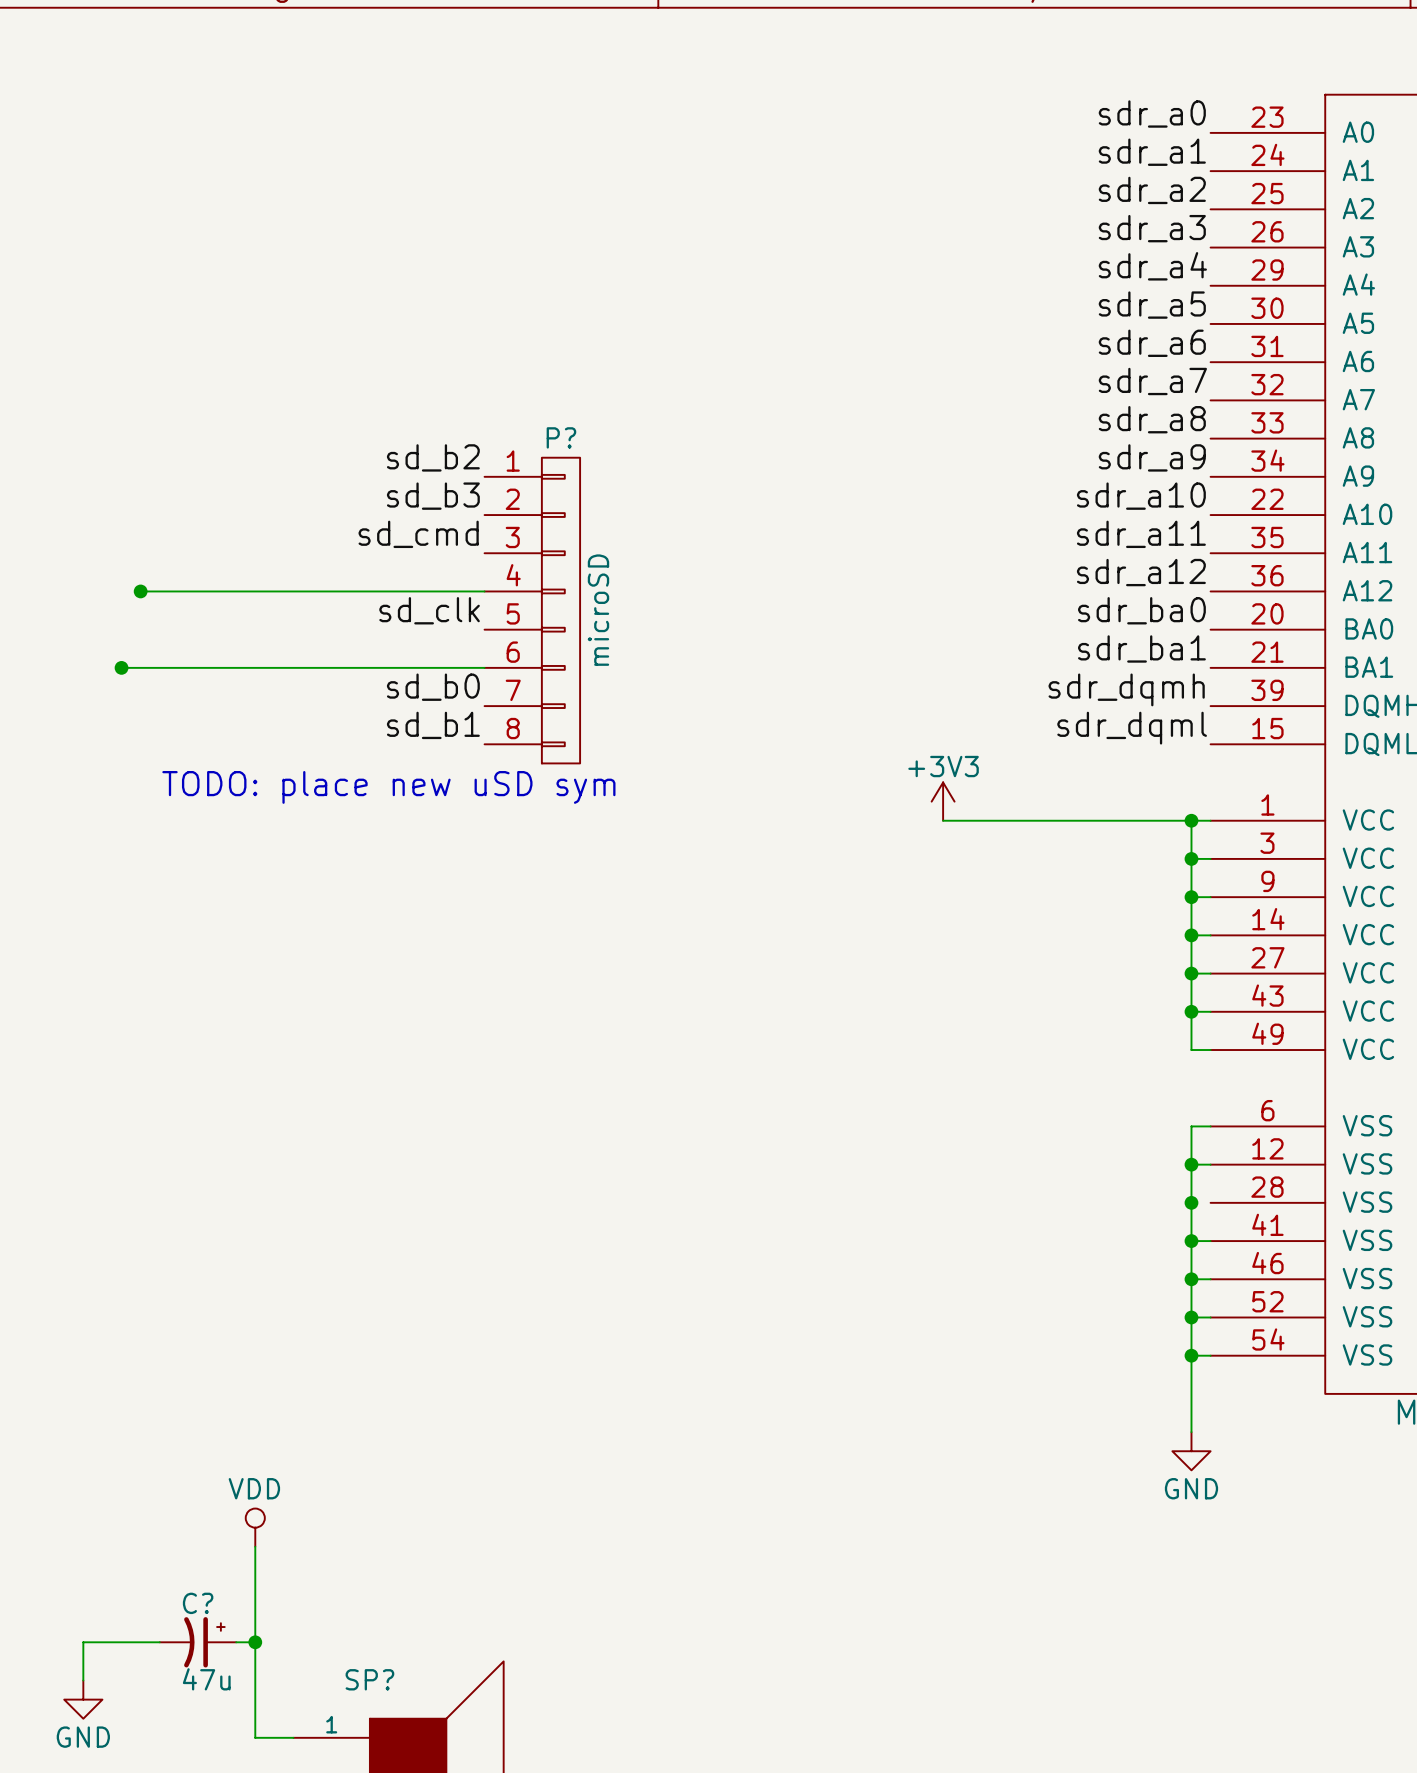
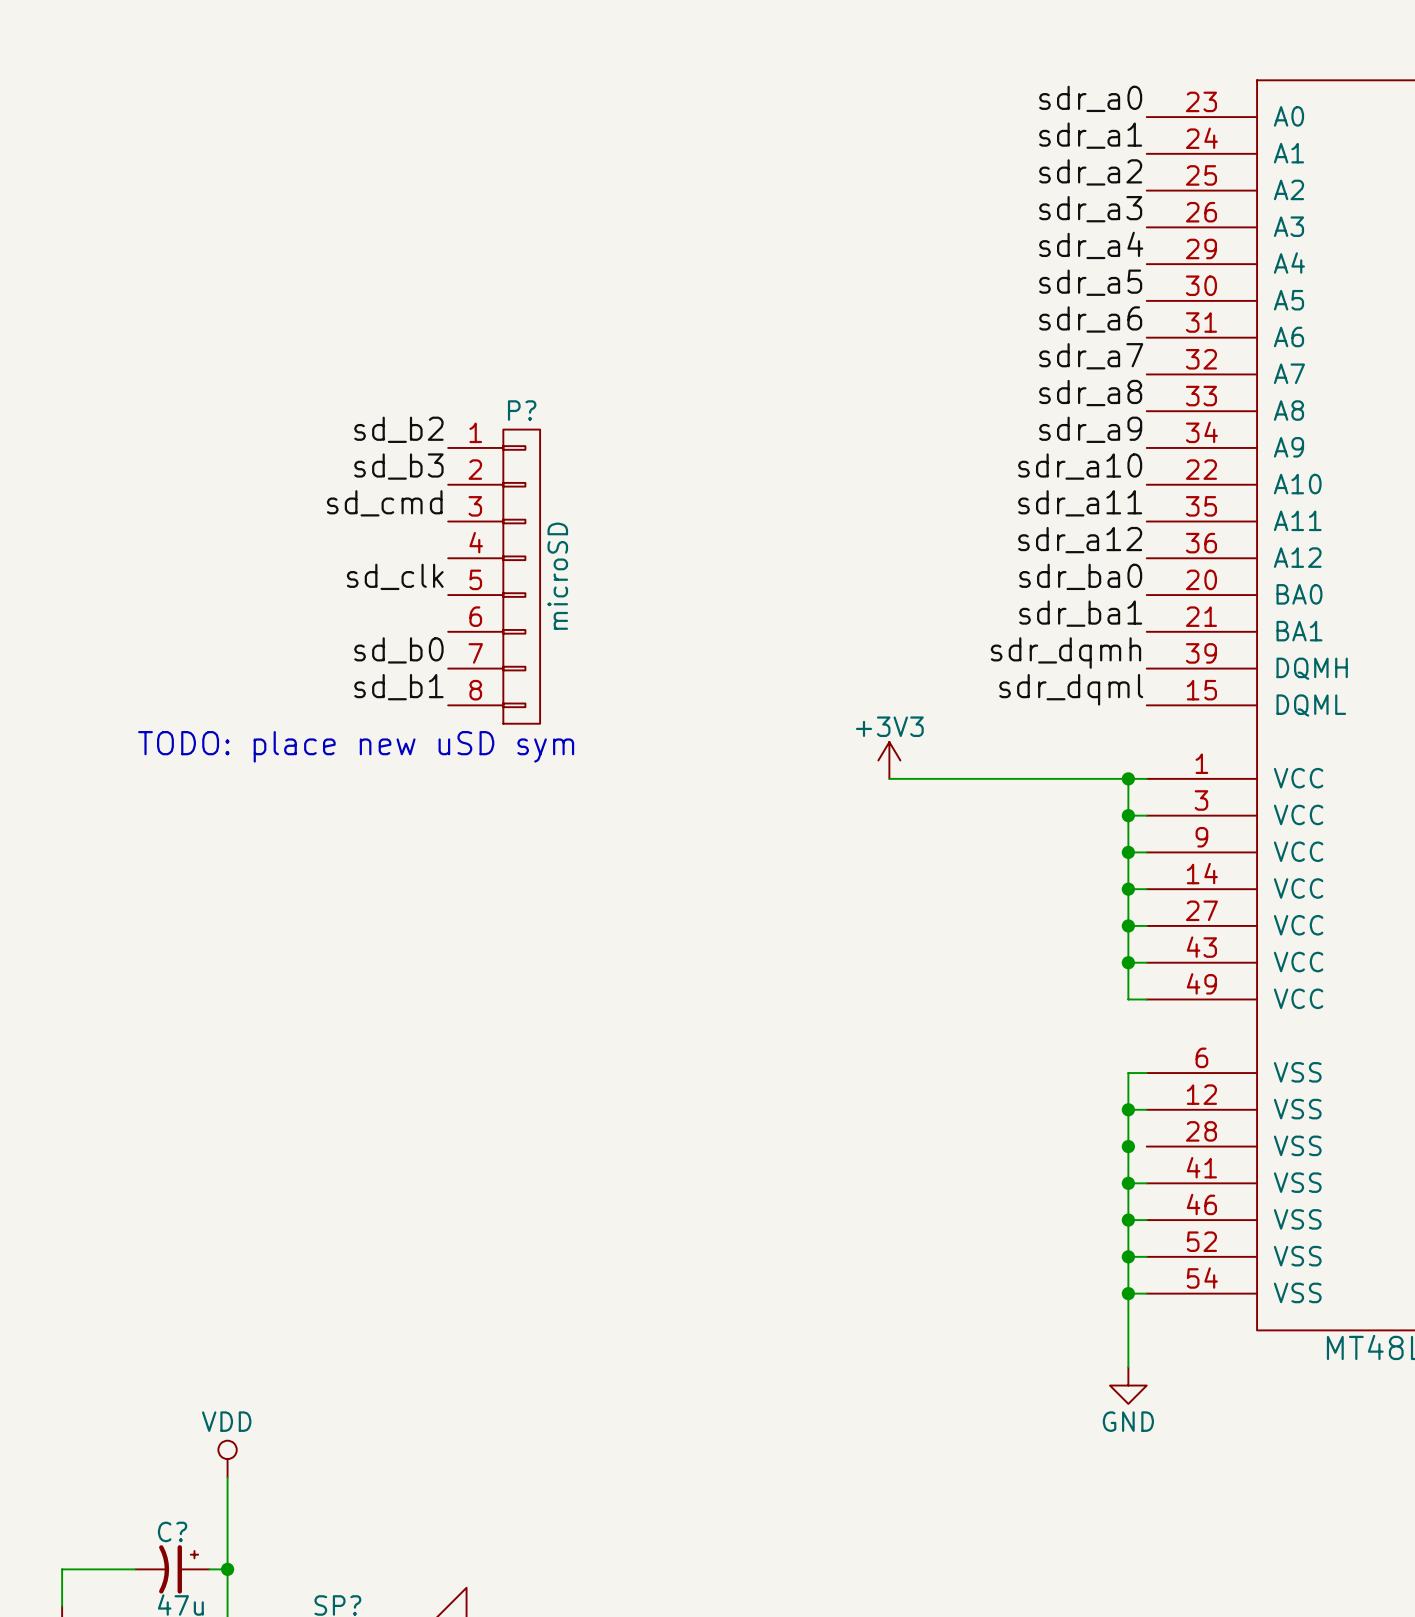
wire: (140, 591) (484, 591) -> none
junction: (140, 591) -> none
wire: (121, 667) (484, 667) -> none
junction: (121, 667) -> none

